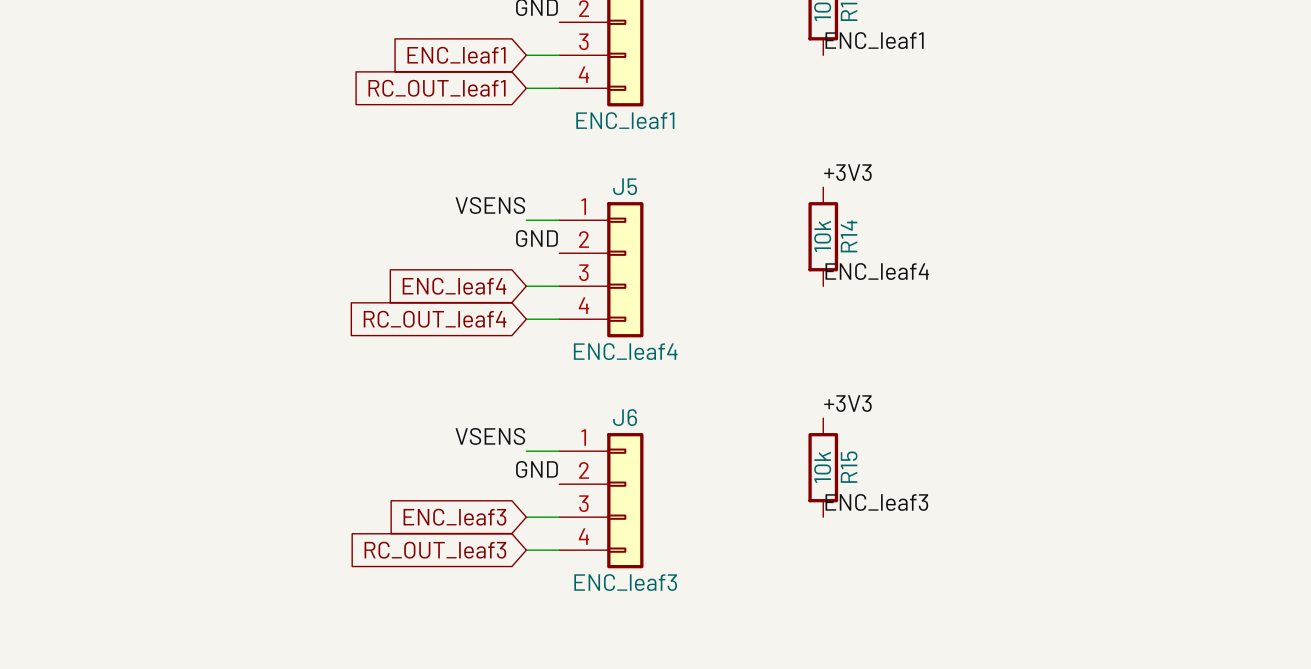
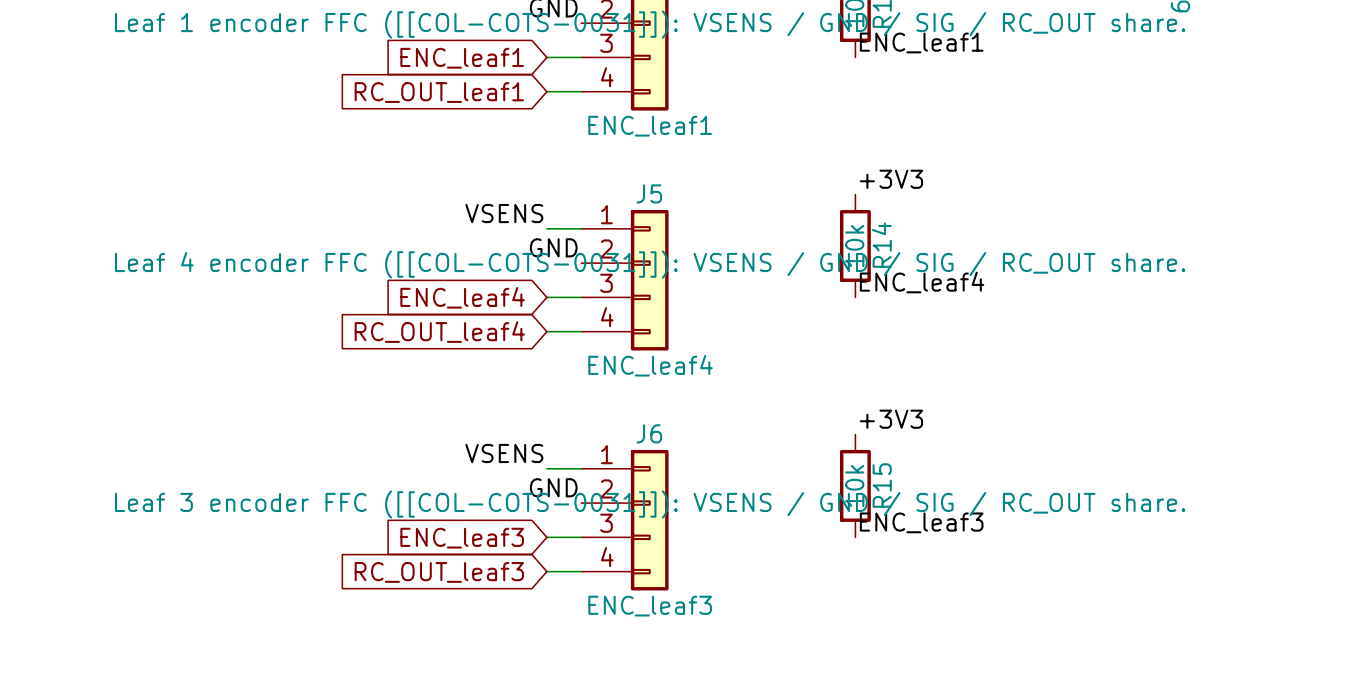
part text: none -> Leaf 1 encoder FFC ([[COL-COTS-0031]]): VSENS / GND / SIG / RC_OUT share. (650, 24)
J5 text: none -> Leaf 4 encoder FFC ([[COL-COTS-0031]]): VSENS / GND / SIG / RC_OUT share. (650, 264)
J6 text: none -> Leaf 3 encoder FFC ([[COL-COTS-0031]]): VSENS / GND / SIG / RC_OUT share. (650, 504)

